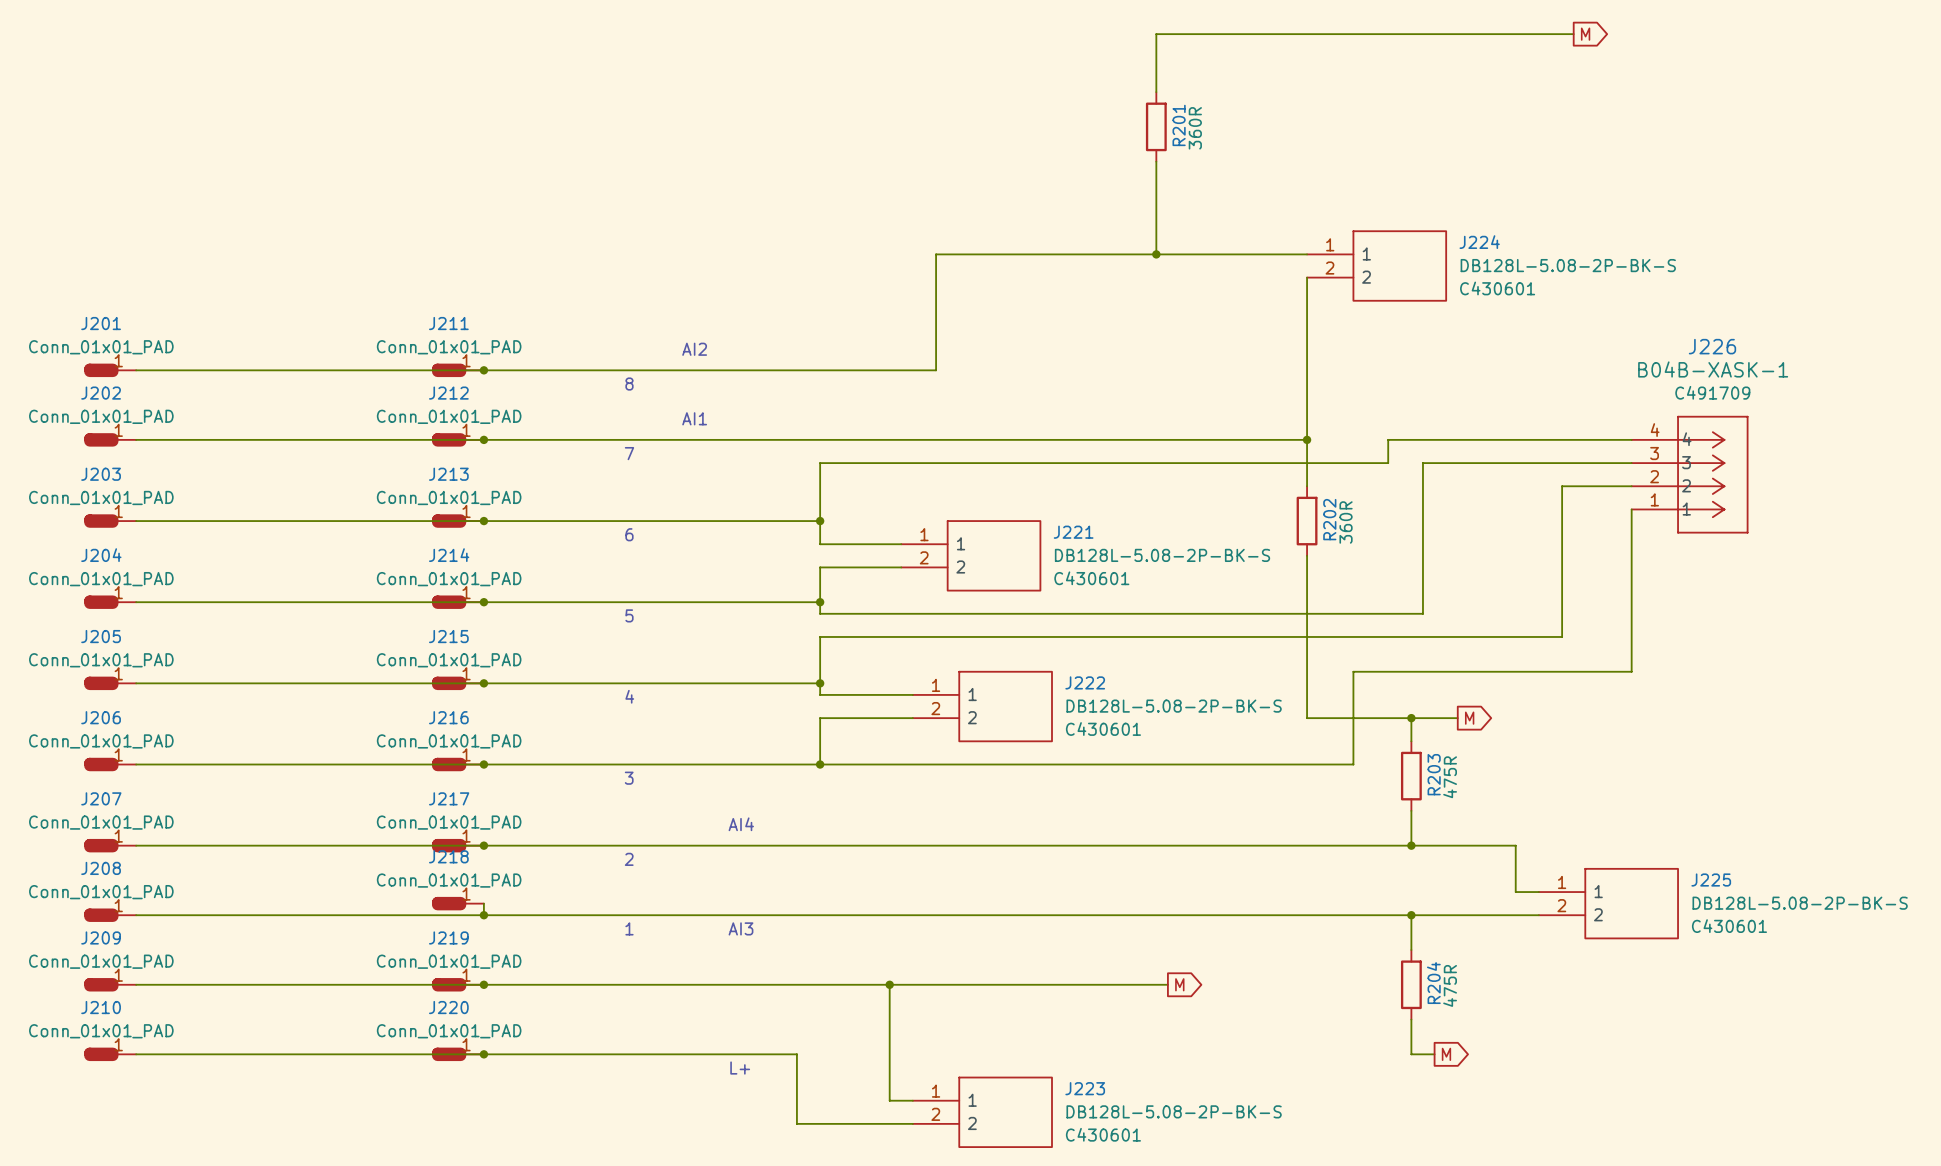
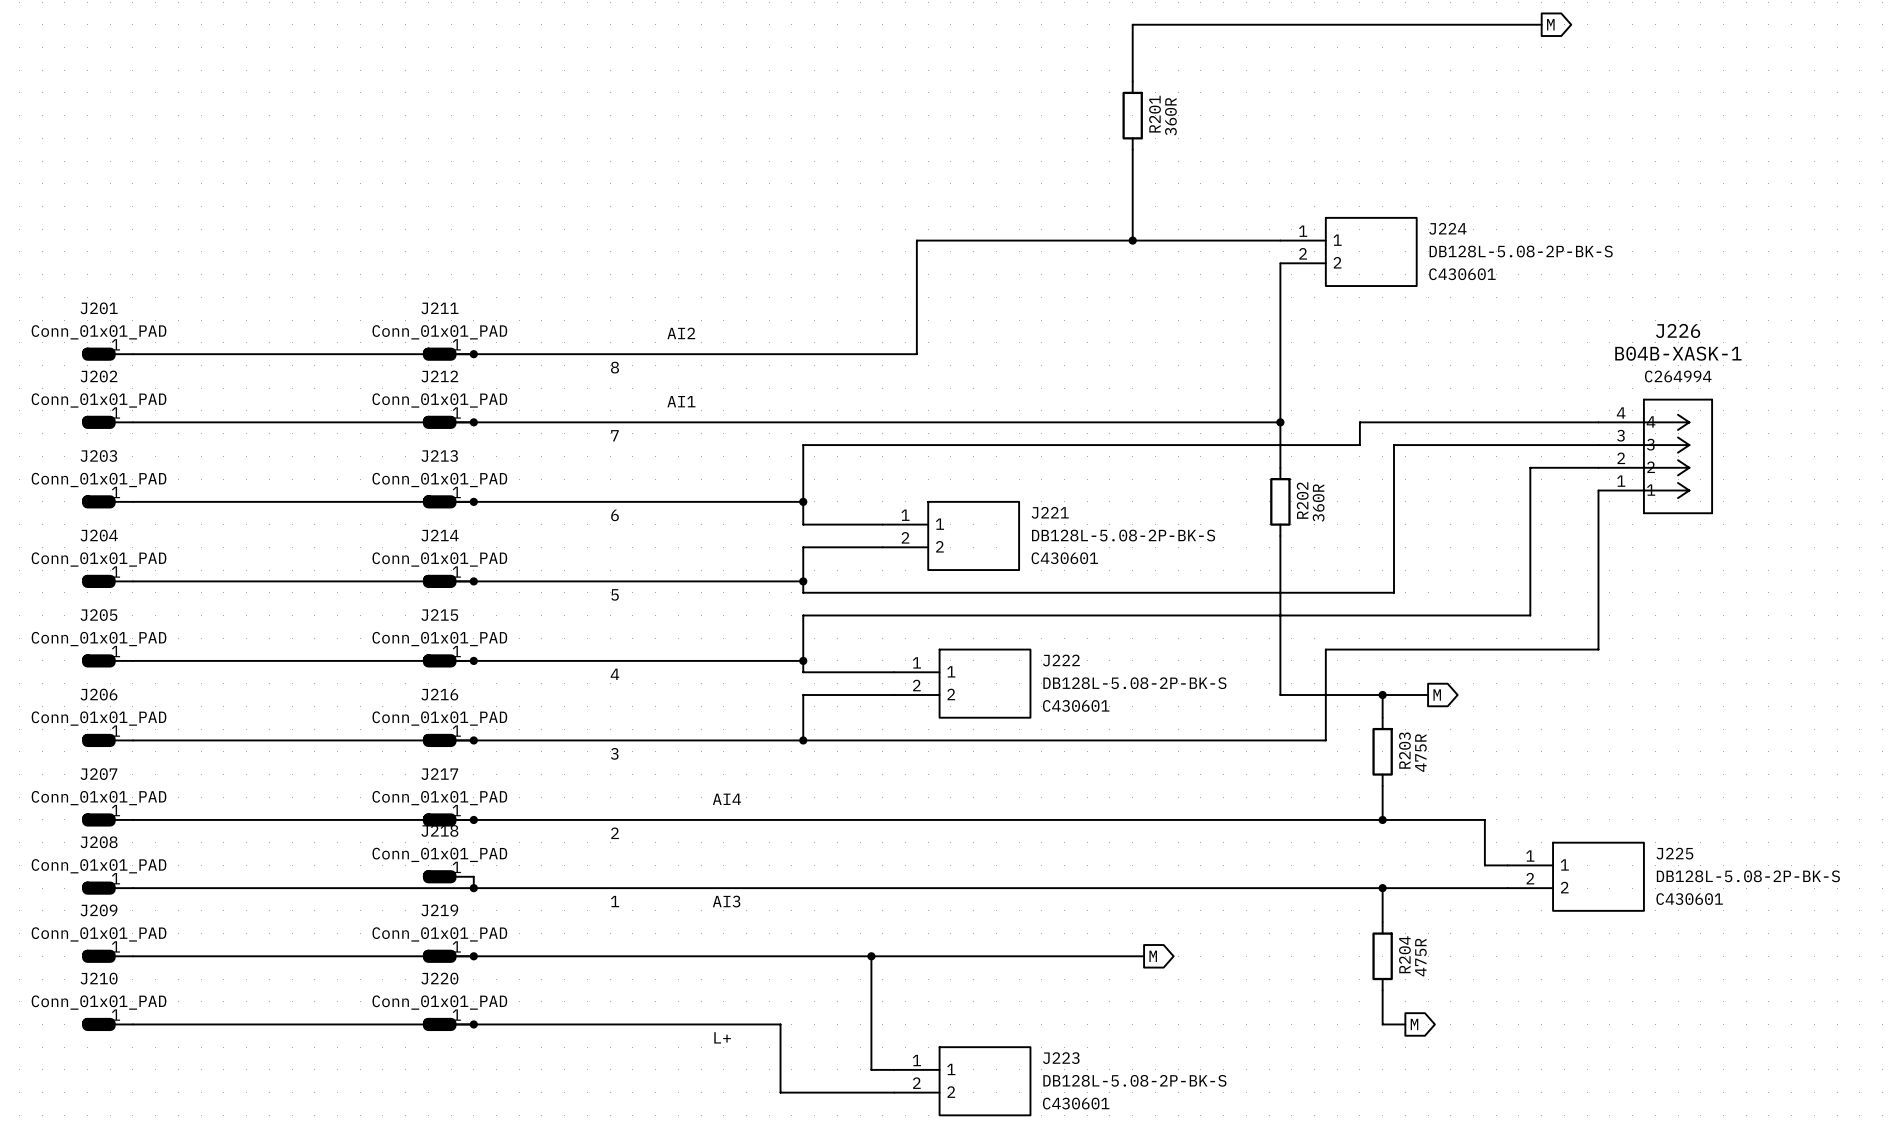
J226 text: C491709 (1712, 392) -> C264994 (1678, 376)

